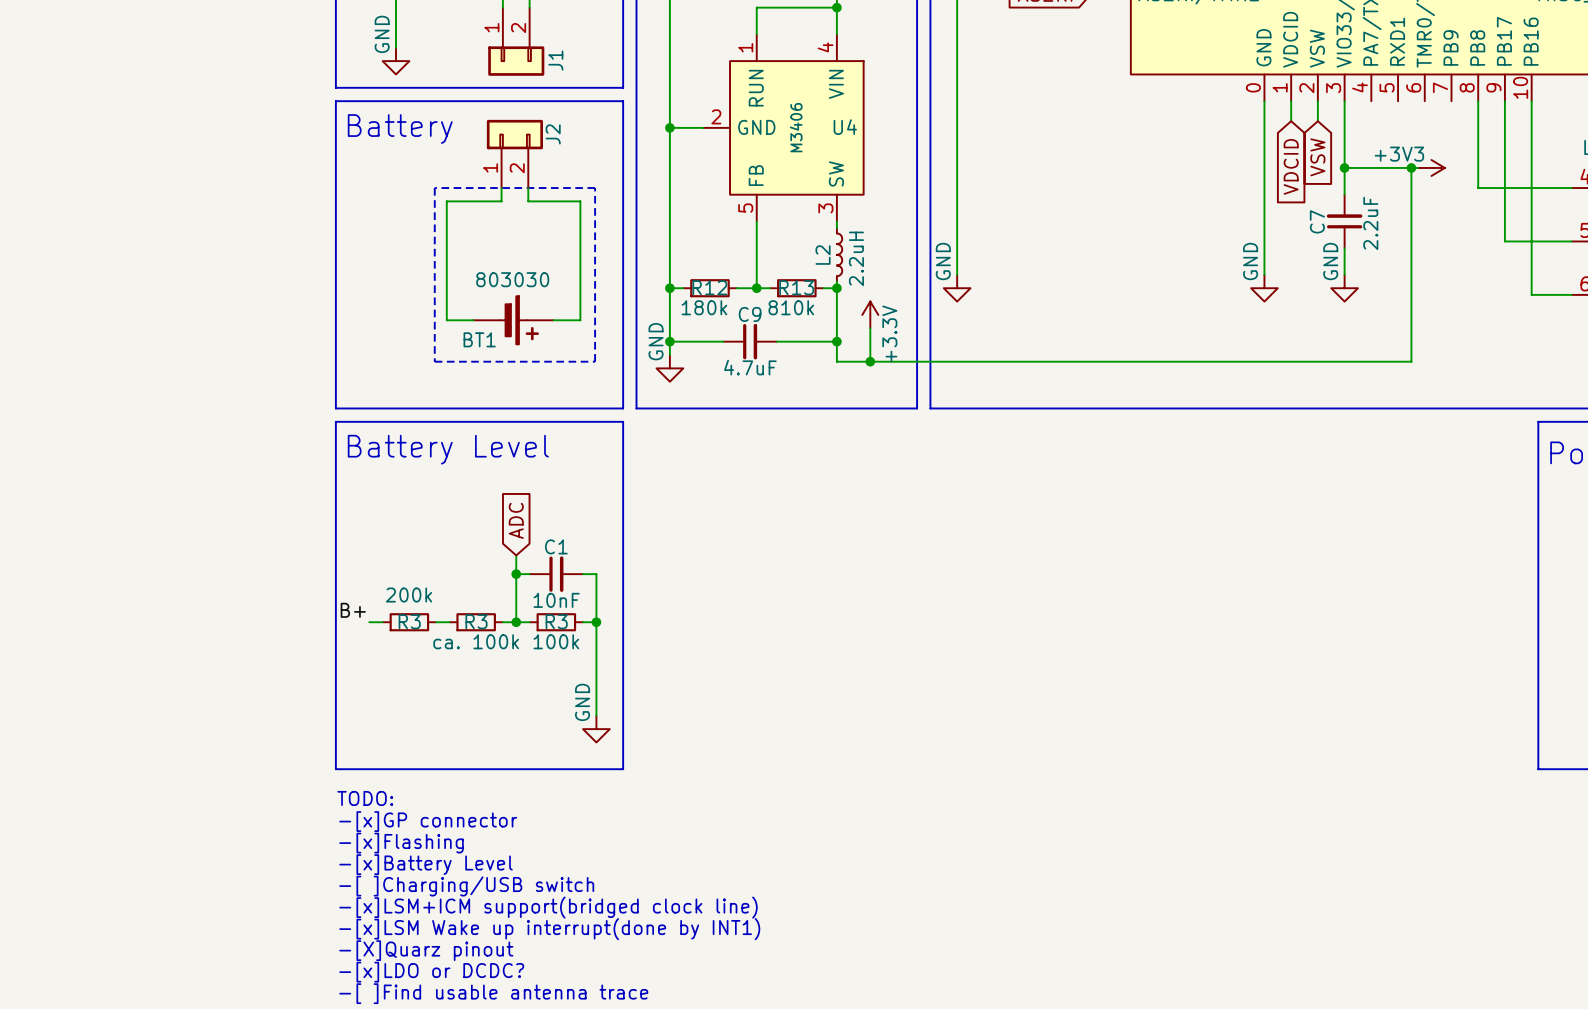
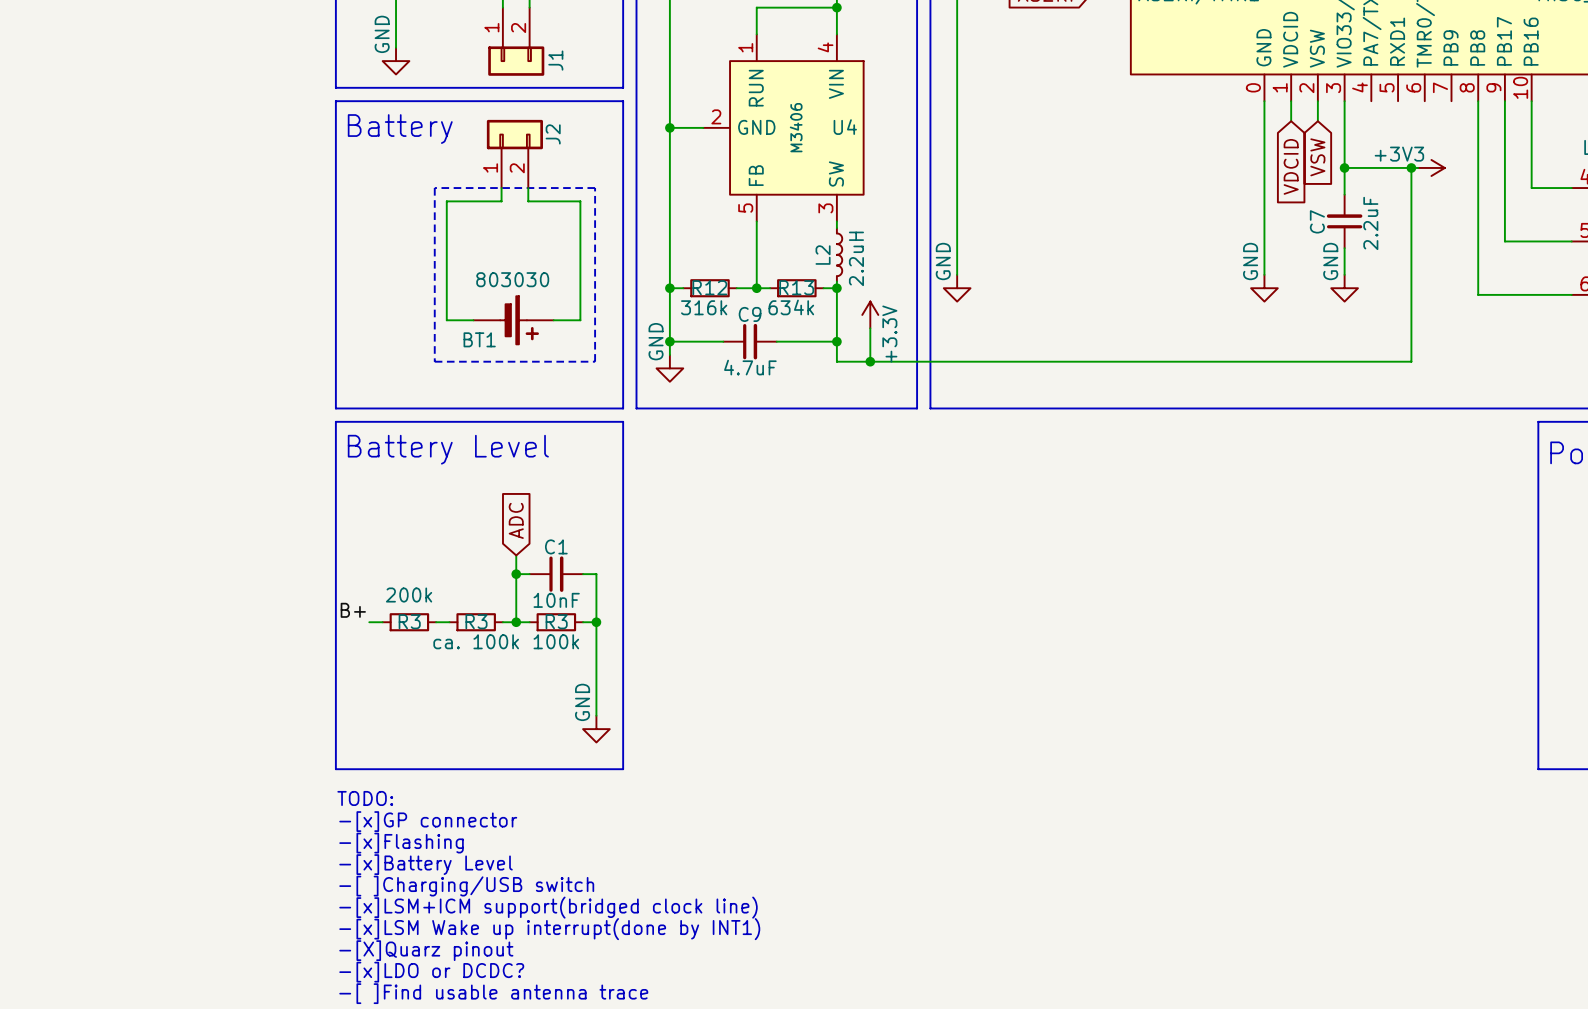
wire: (1478, 188) (1531, 188) (1531, 294) -> (1478, 188) (1478, 294) (1531, 294)
R12 value: 180k (704, 307) -> 316k (704, 307)
R13 value: 810k (791, 307) -> 634k (791, 307)

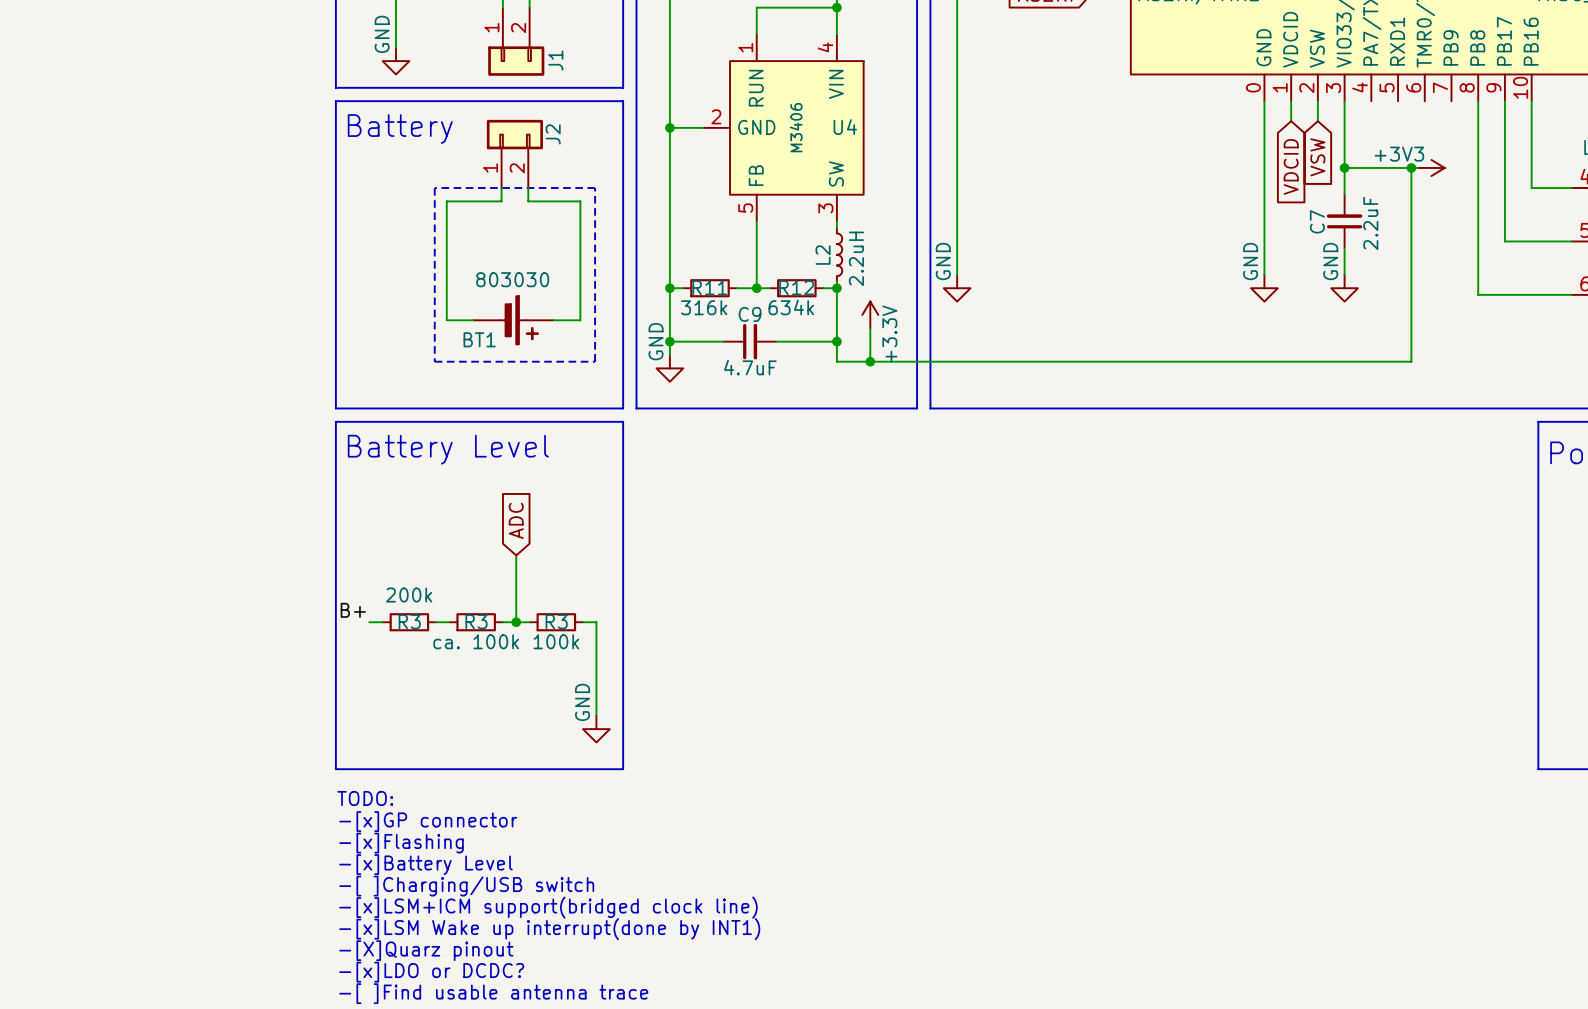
R12 name: R12 (709, 287) -> R11 (709, 287)
R13 name: R13 (796, 287) -> R12 (796, 287)
wire: (516, 574) (529, 574) -> none
junction: (516, 574) -> none
C1: 10nF (556, 574) -> none
wire: (583, 574) (596, 574) (596, 622) -> none
junction: (596, 622) -> none

